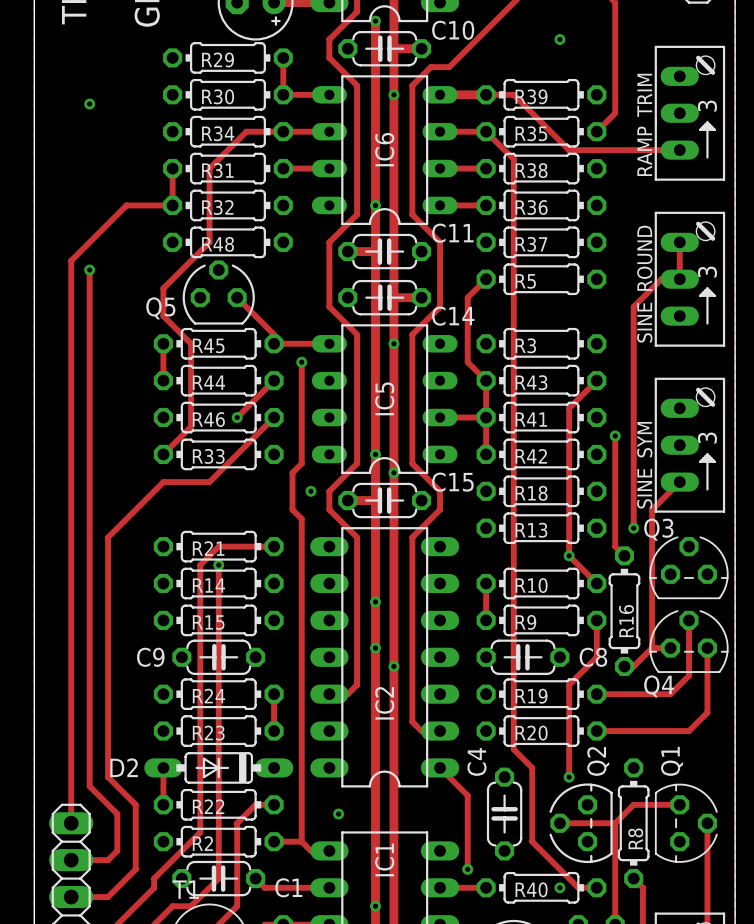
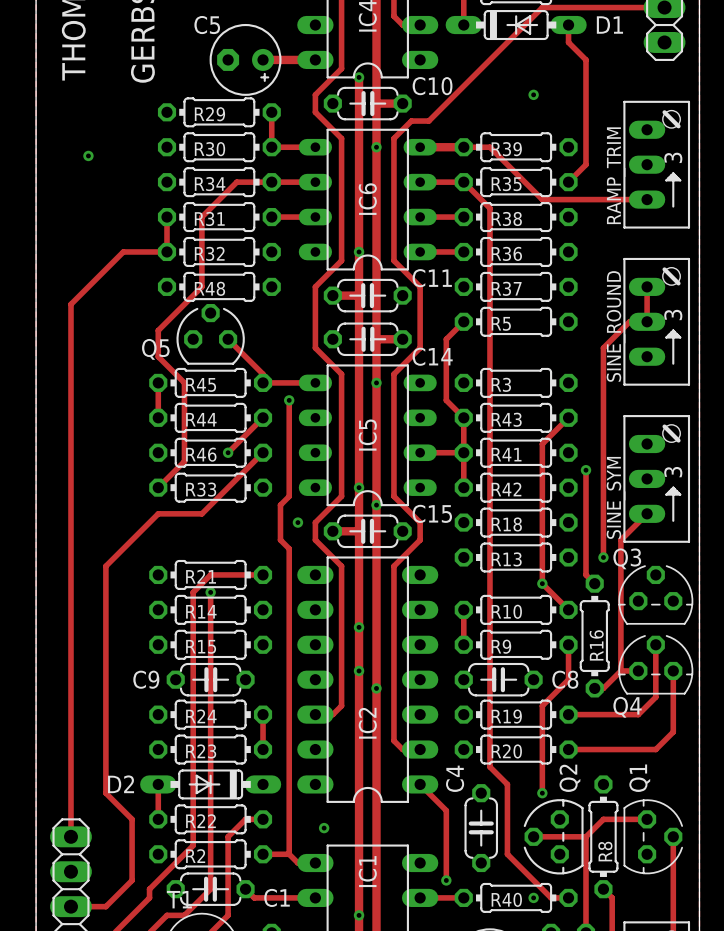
track: (89, 270) (89, 786) (117, 814) (117, 850) (108, 860) (71, 860) -> none
via: (89, 270) -> none

